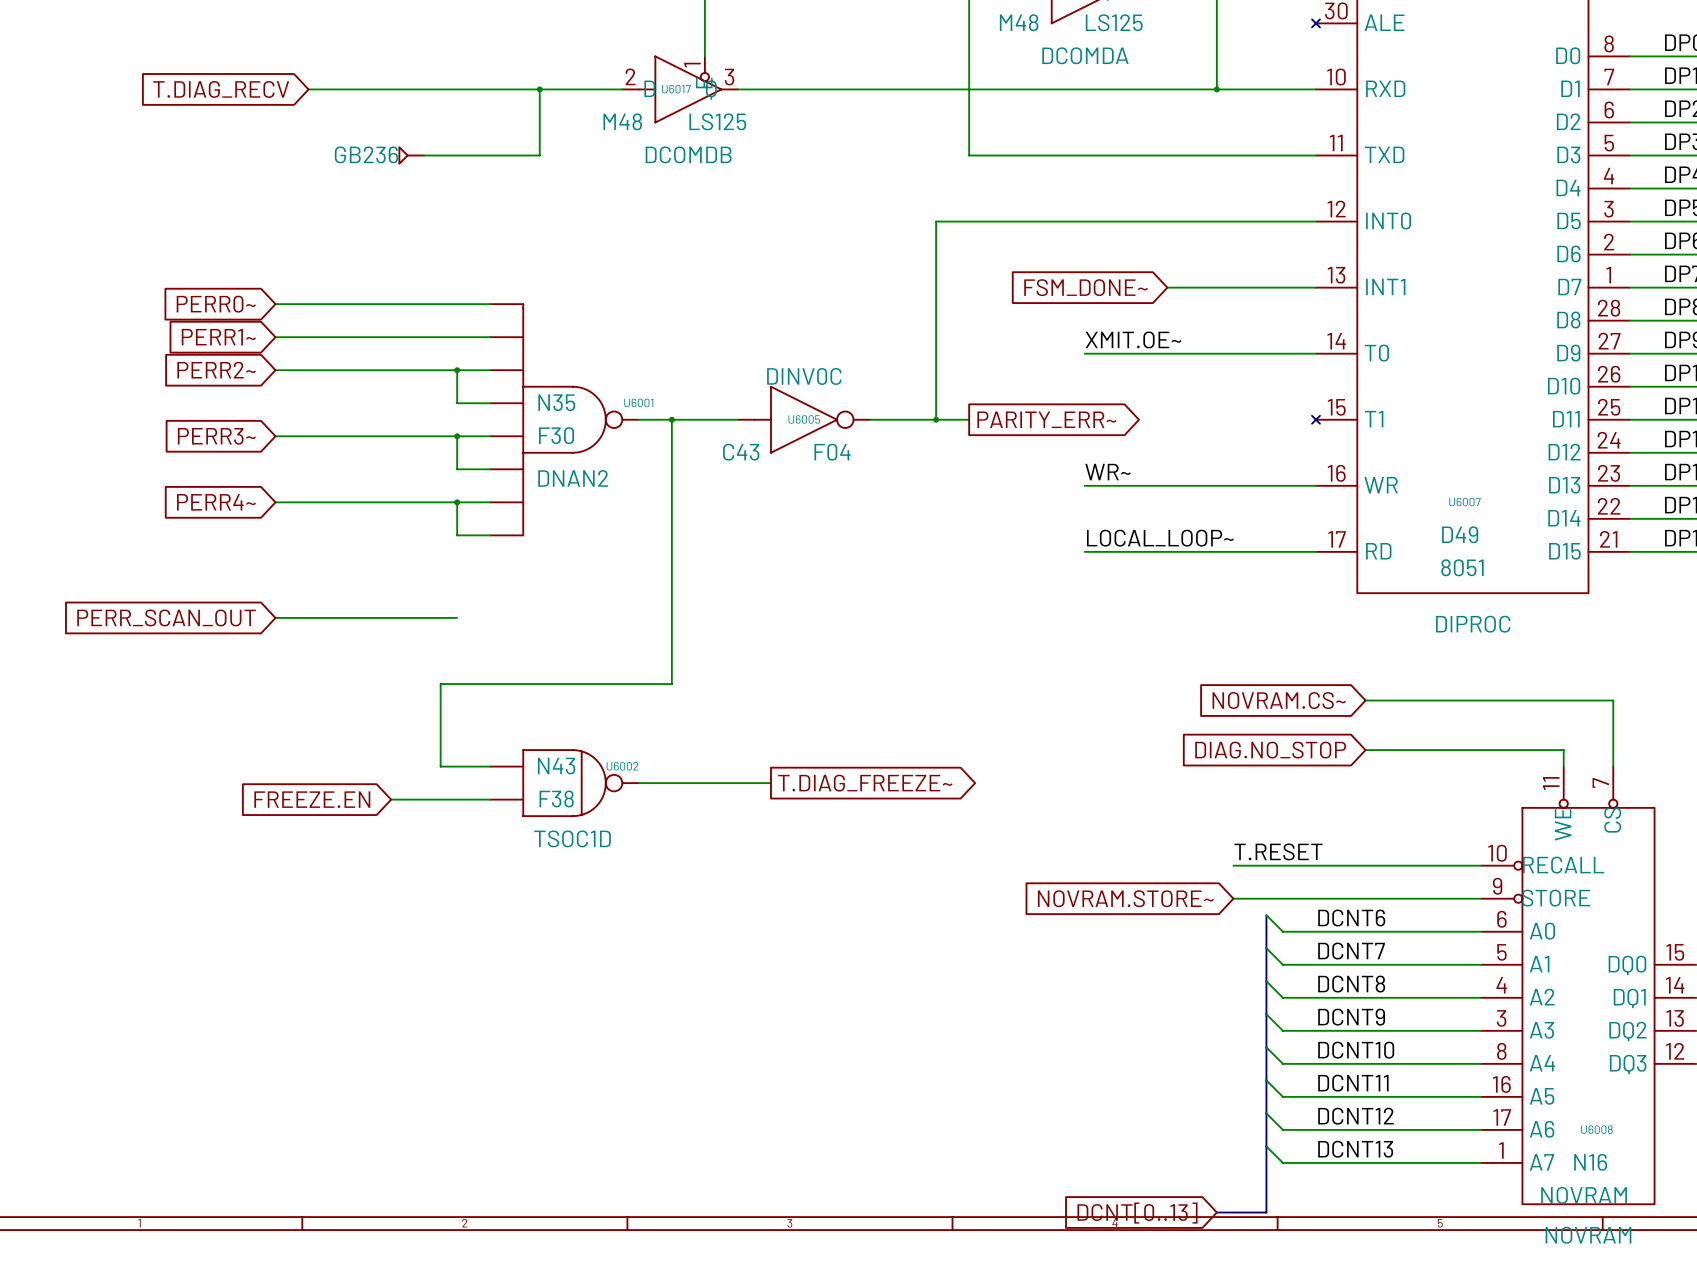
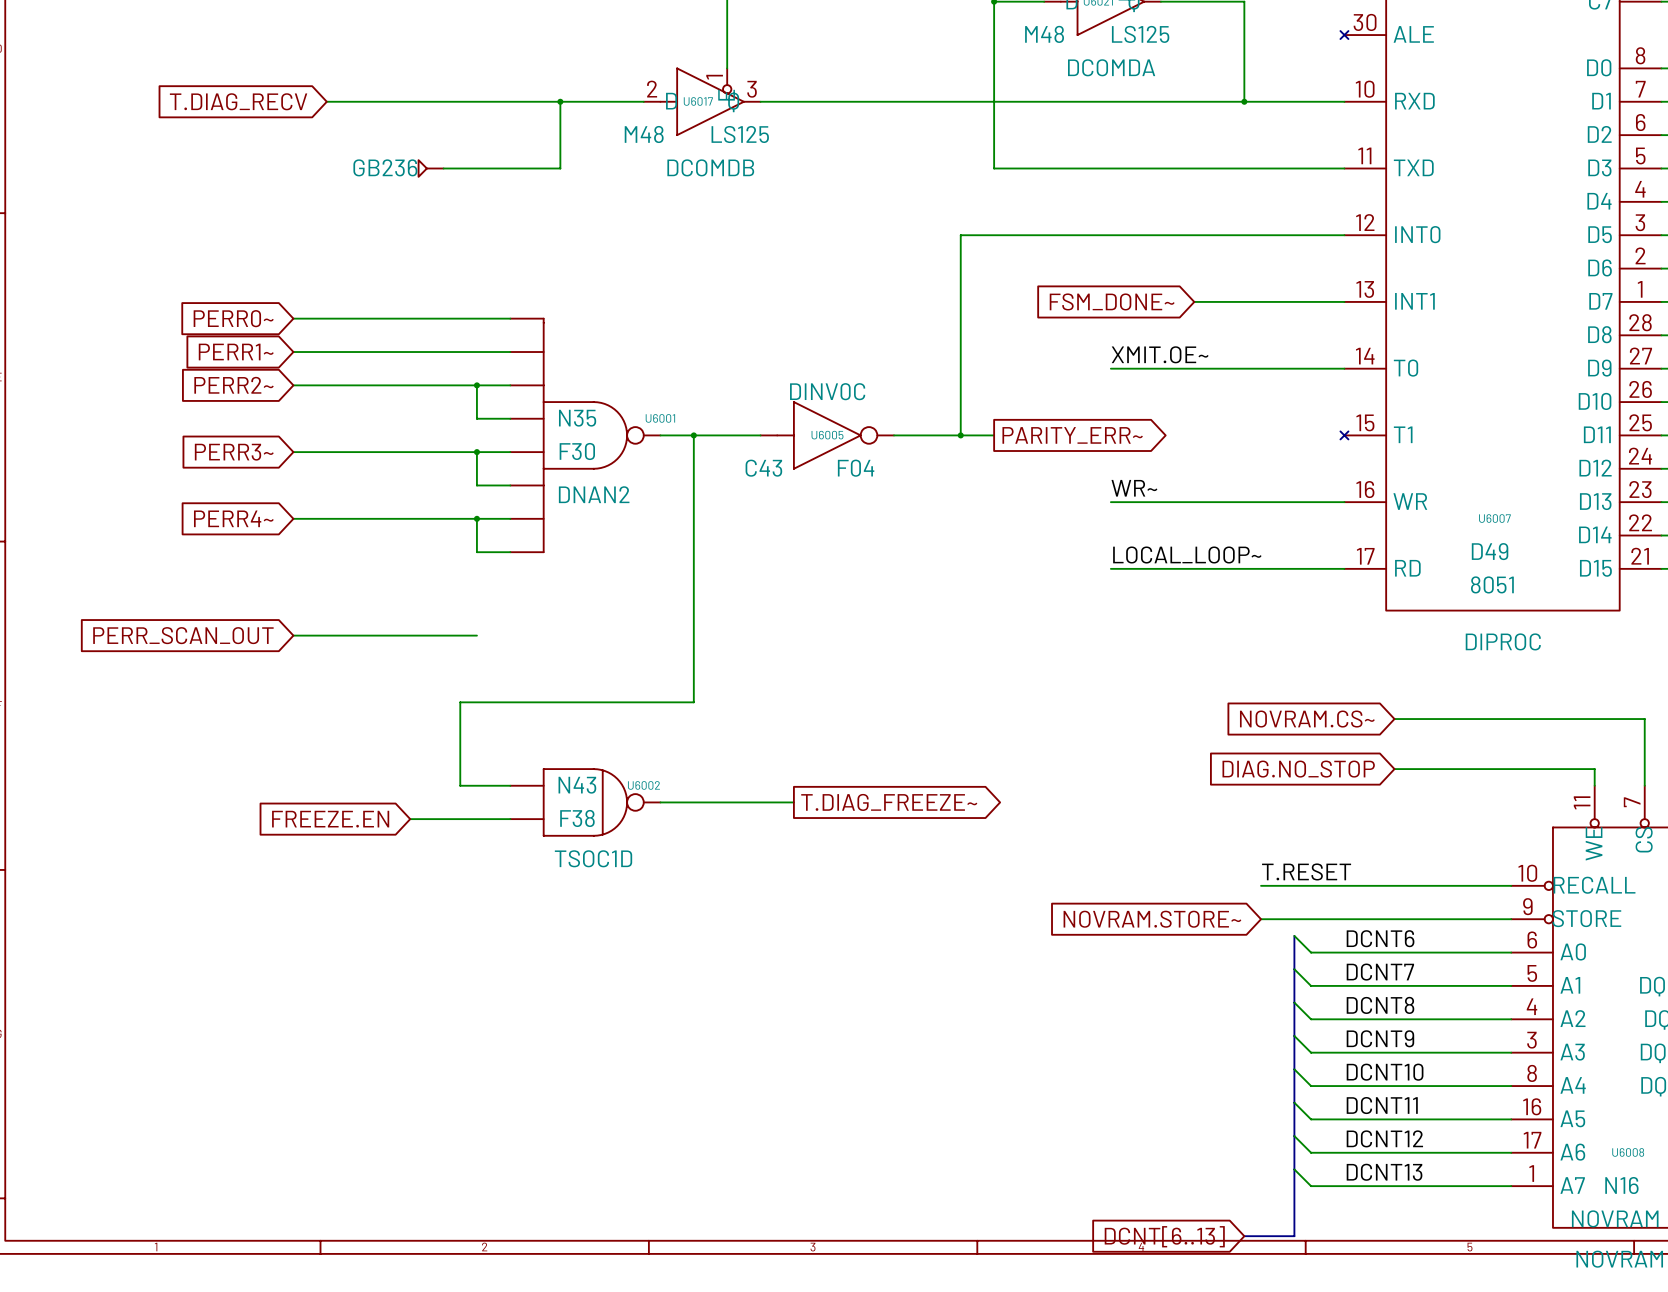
global label: DCNT[0..13] (1137, 1213) -> DCNT[6..13] (1164, 1236)

